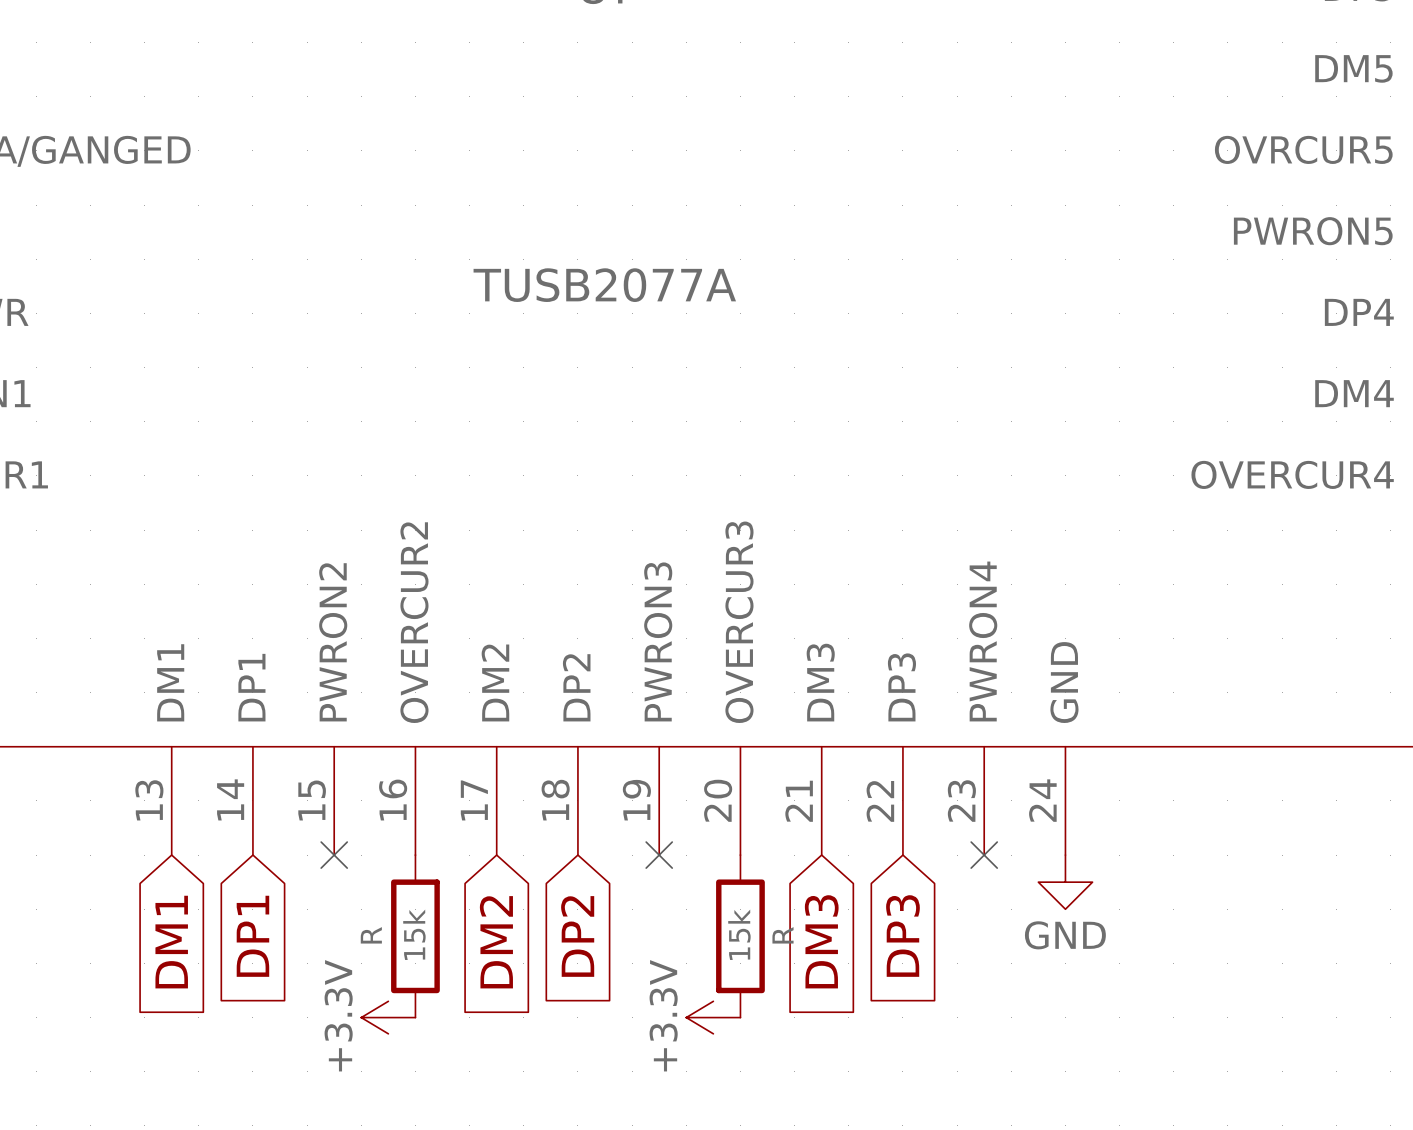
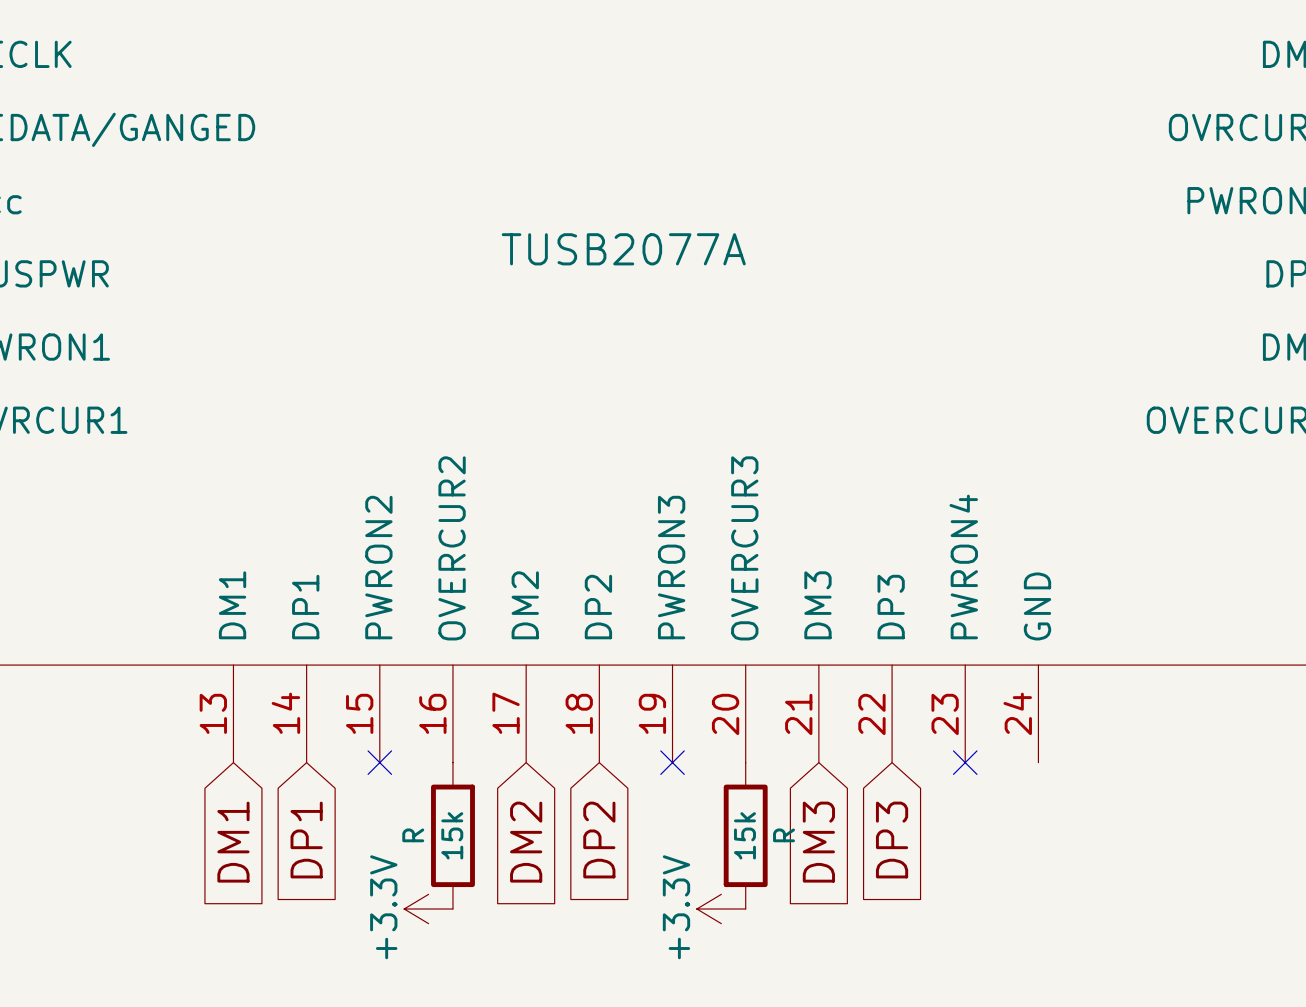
power symbol: GND (1065, 882) -> none

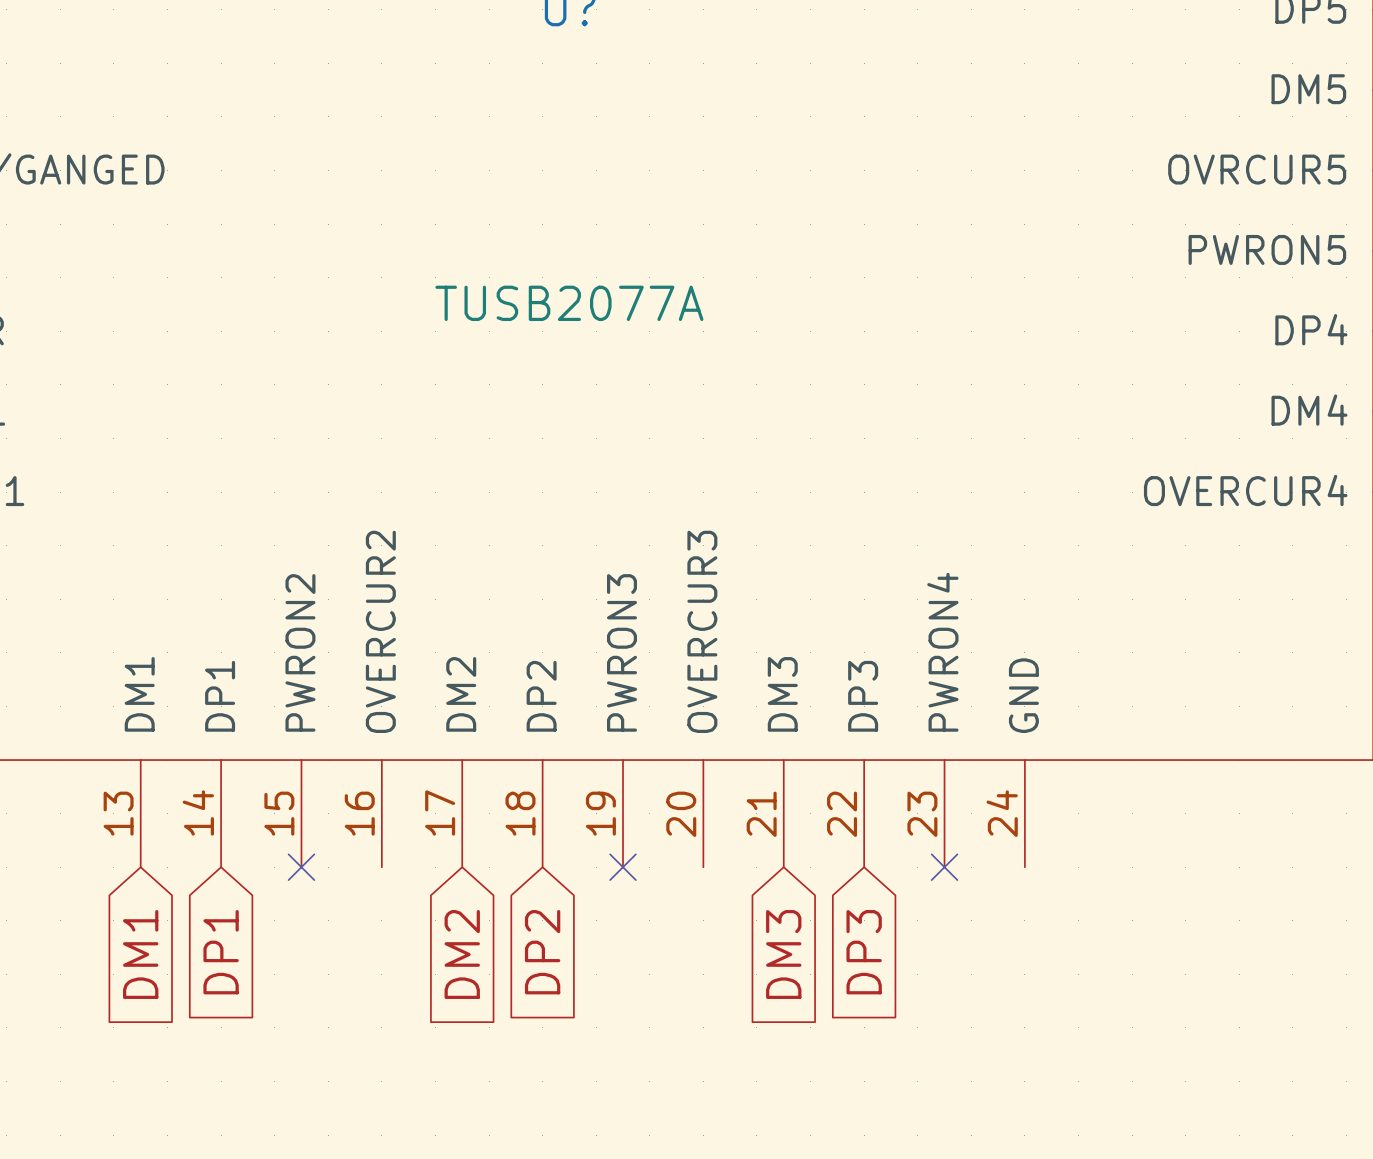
R: 15k (452, 835) -> none
R: 15k (745, 835) -> none
power symbol: +3.3V (428, 909) -> none
power symbol: +3.3V (721, 909) -> none

